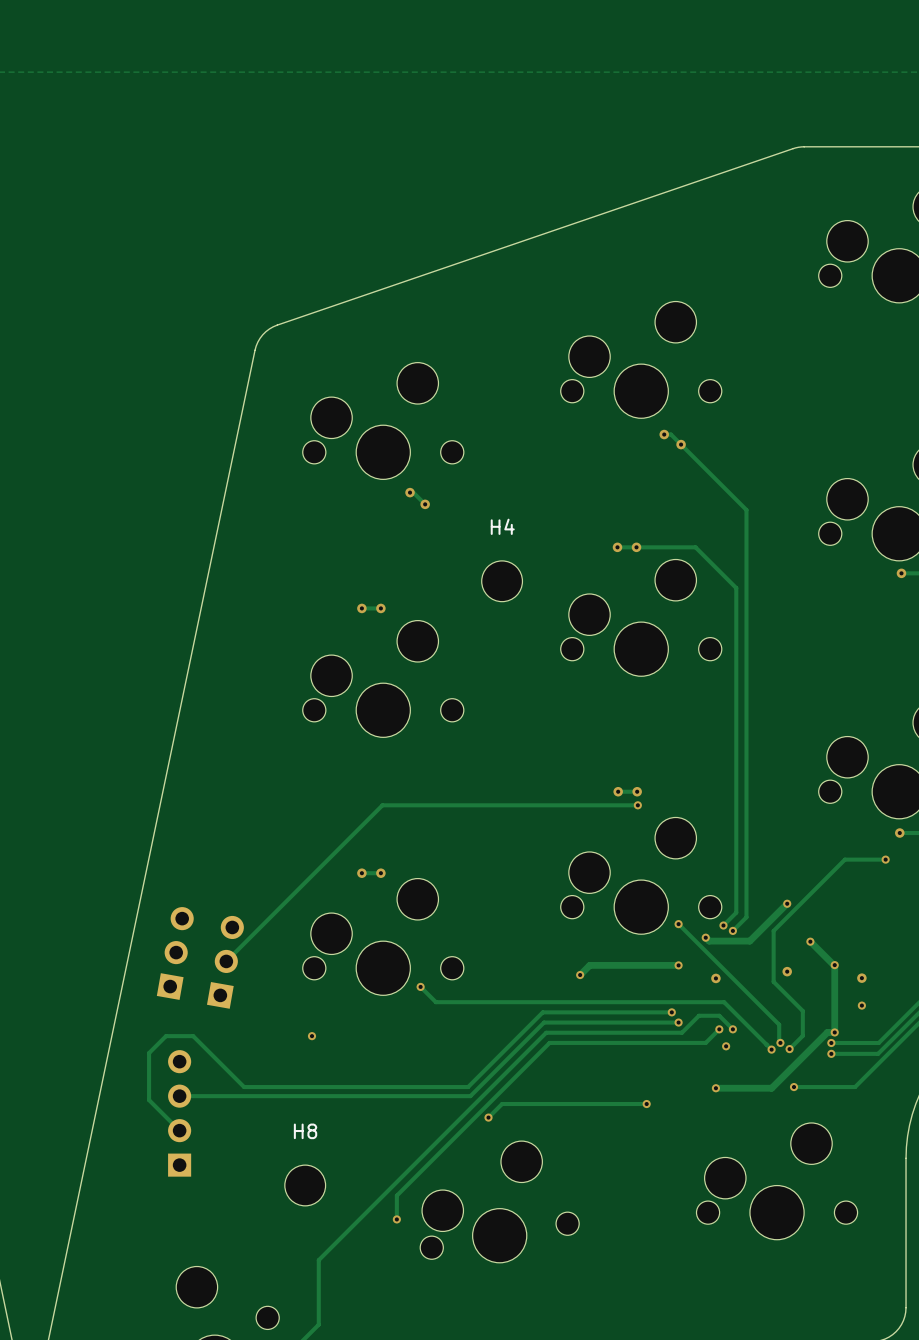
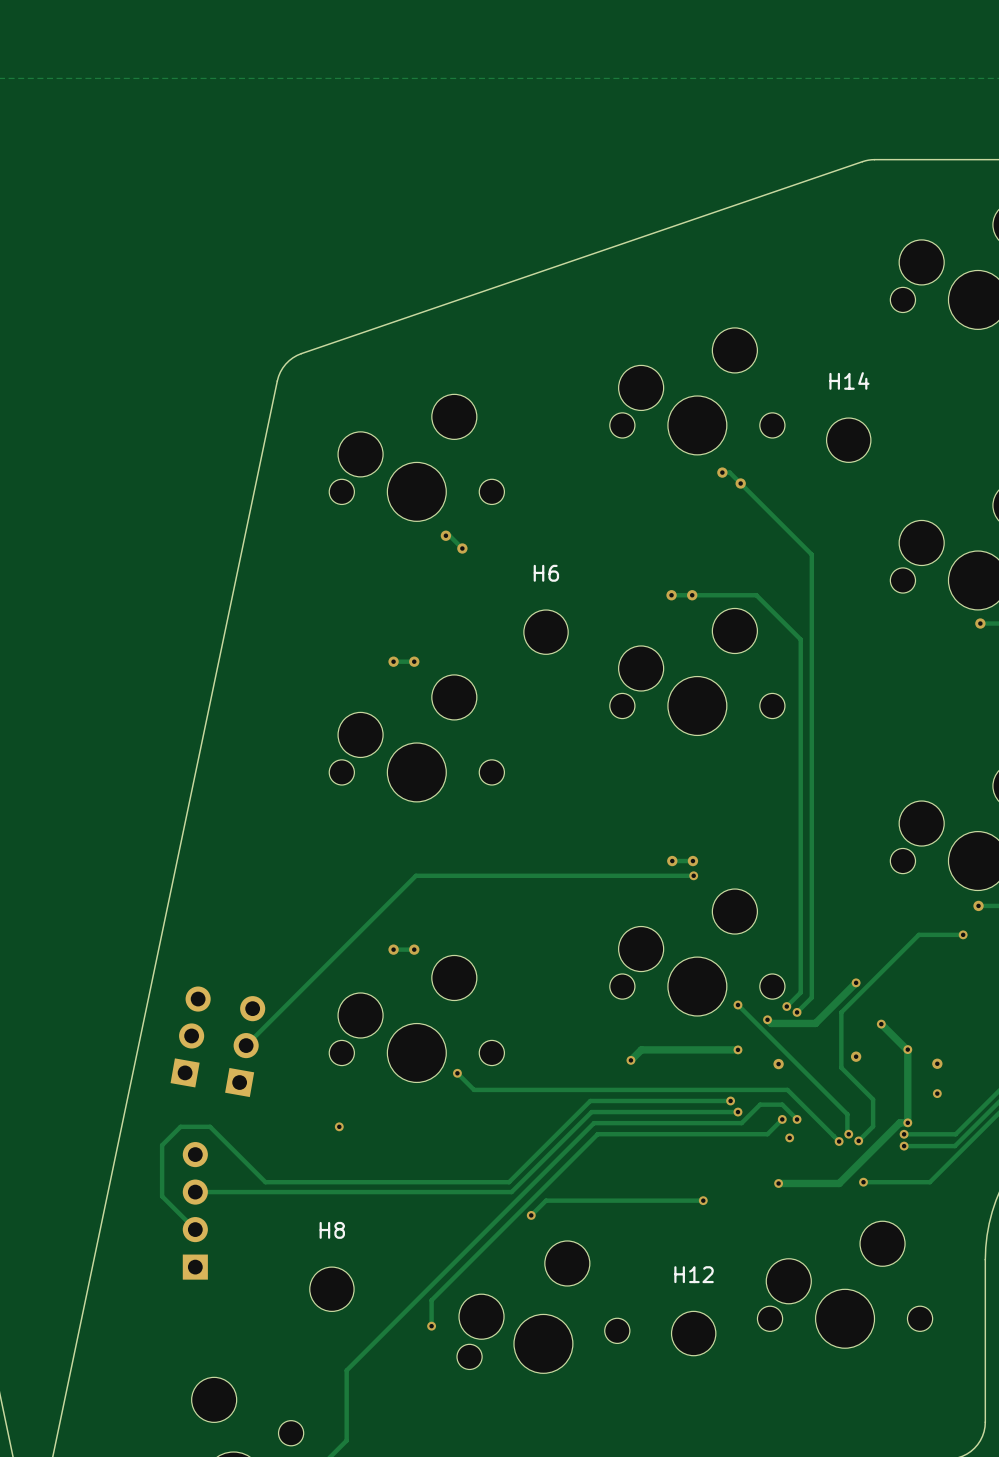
H14: none -> (848, 440)
H4 name: H4 (502, 526) -> H6 (546, 573)
H12: none -> (693, 1333)

